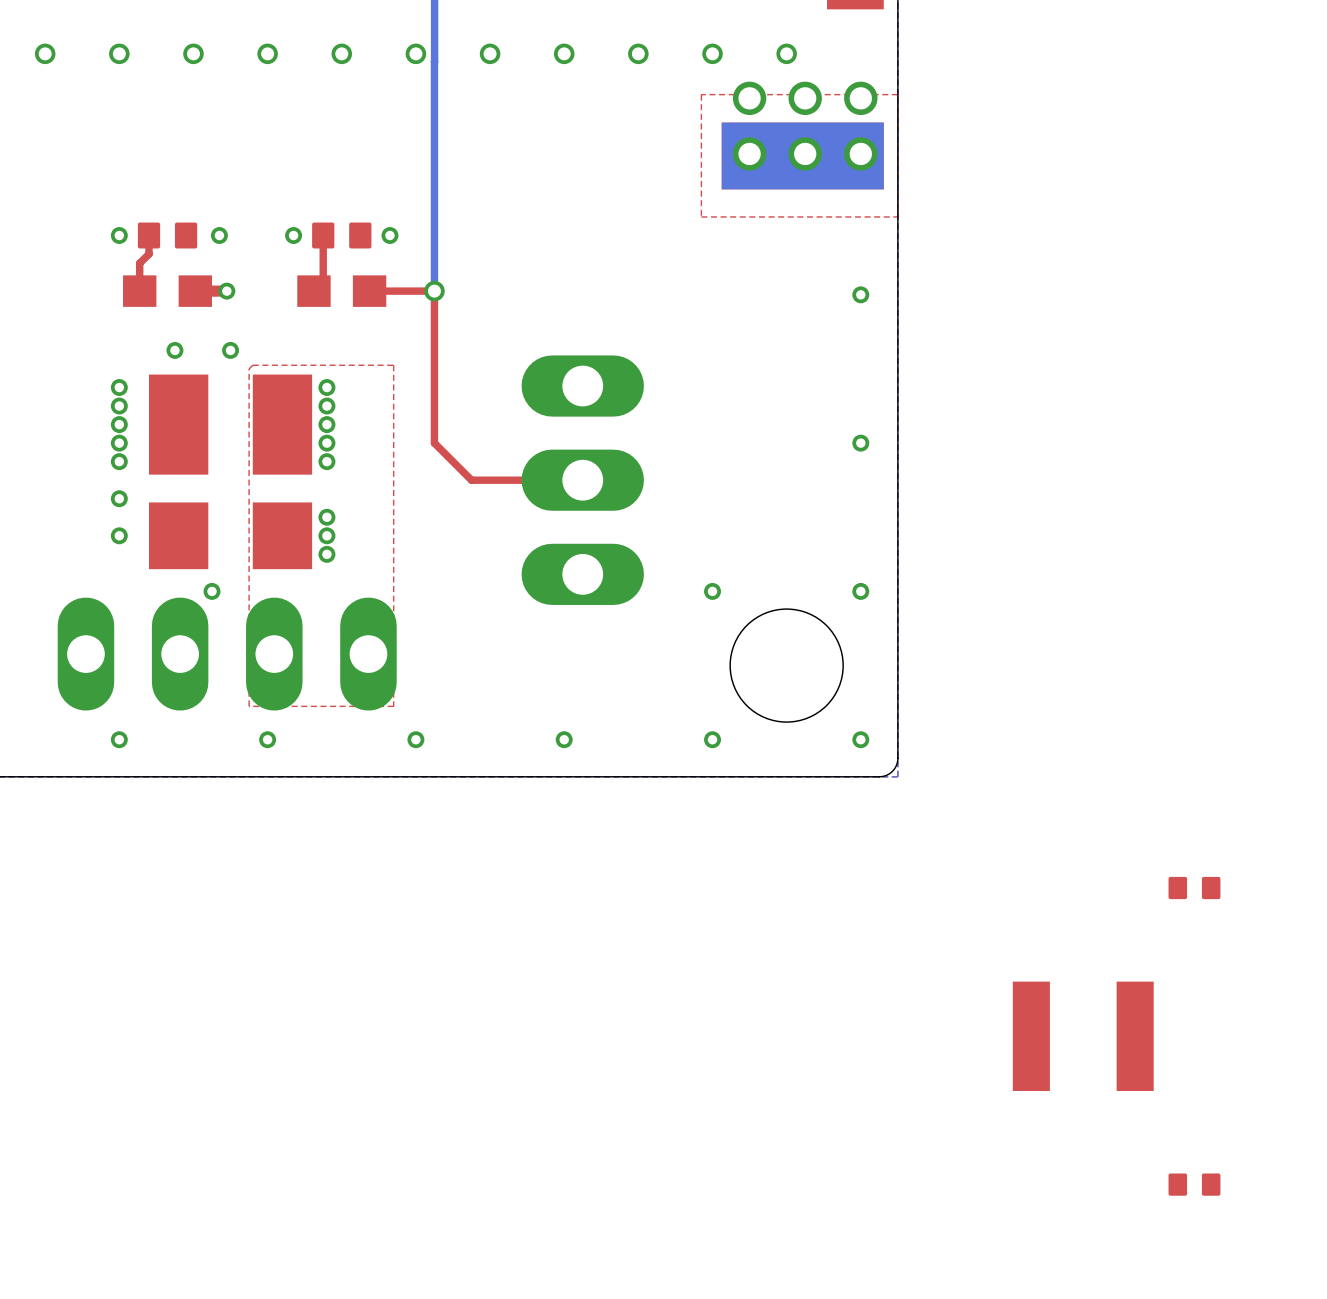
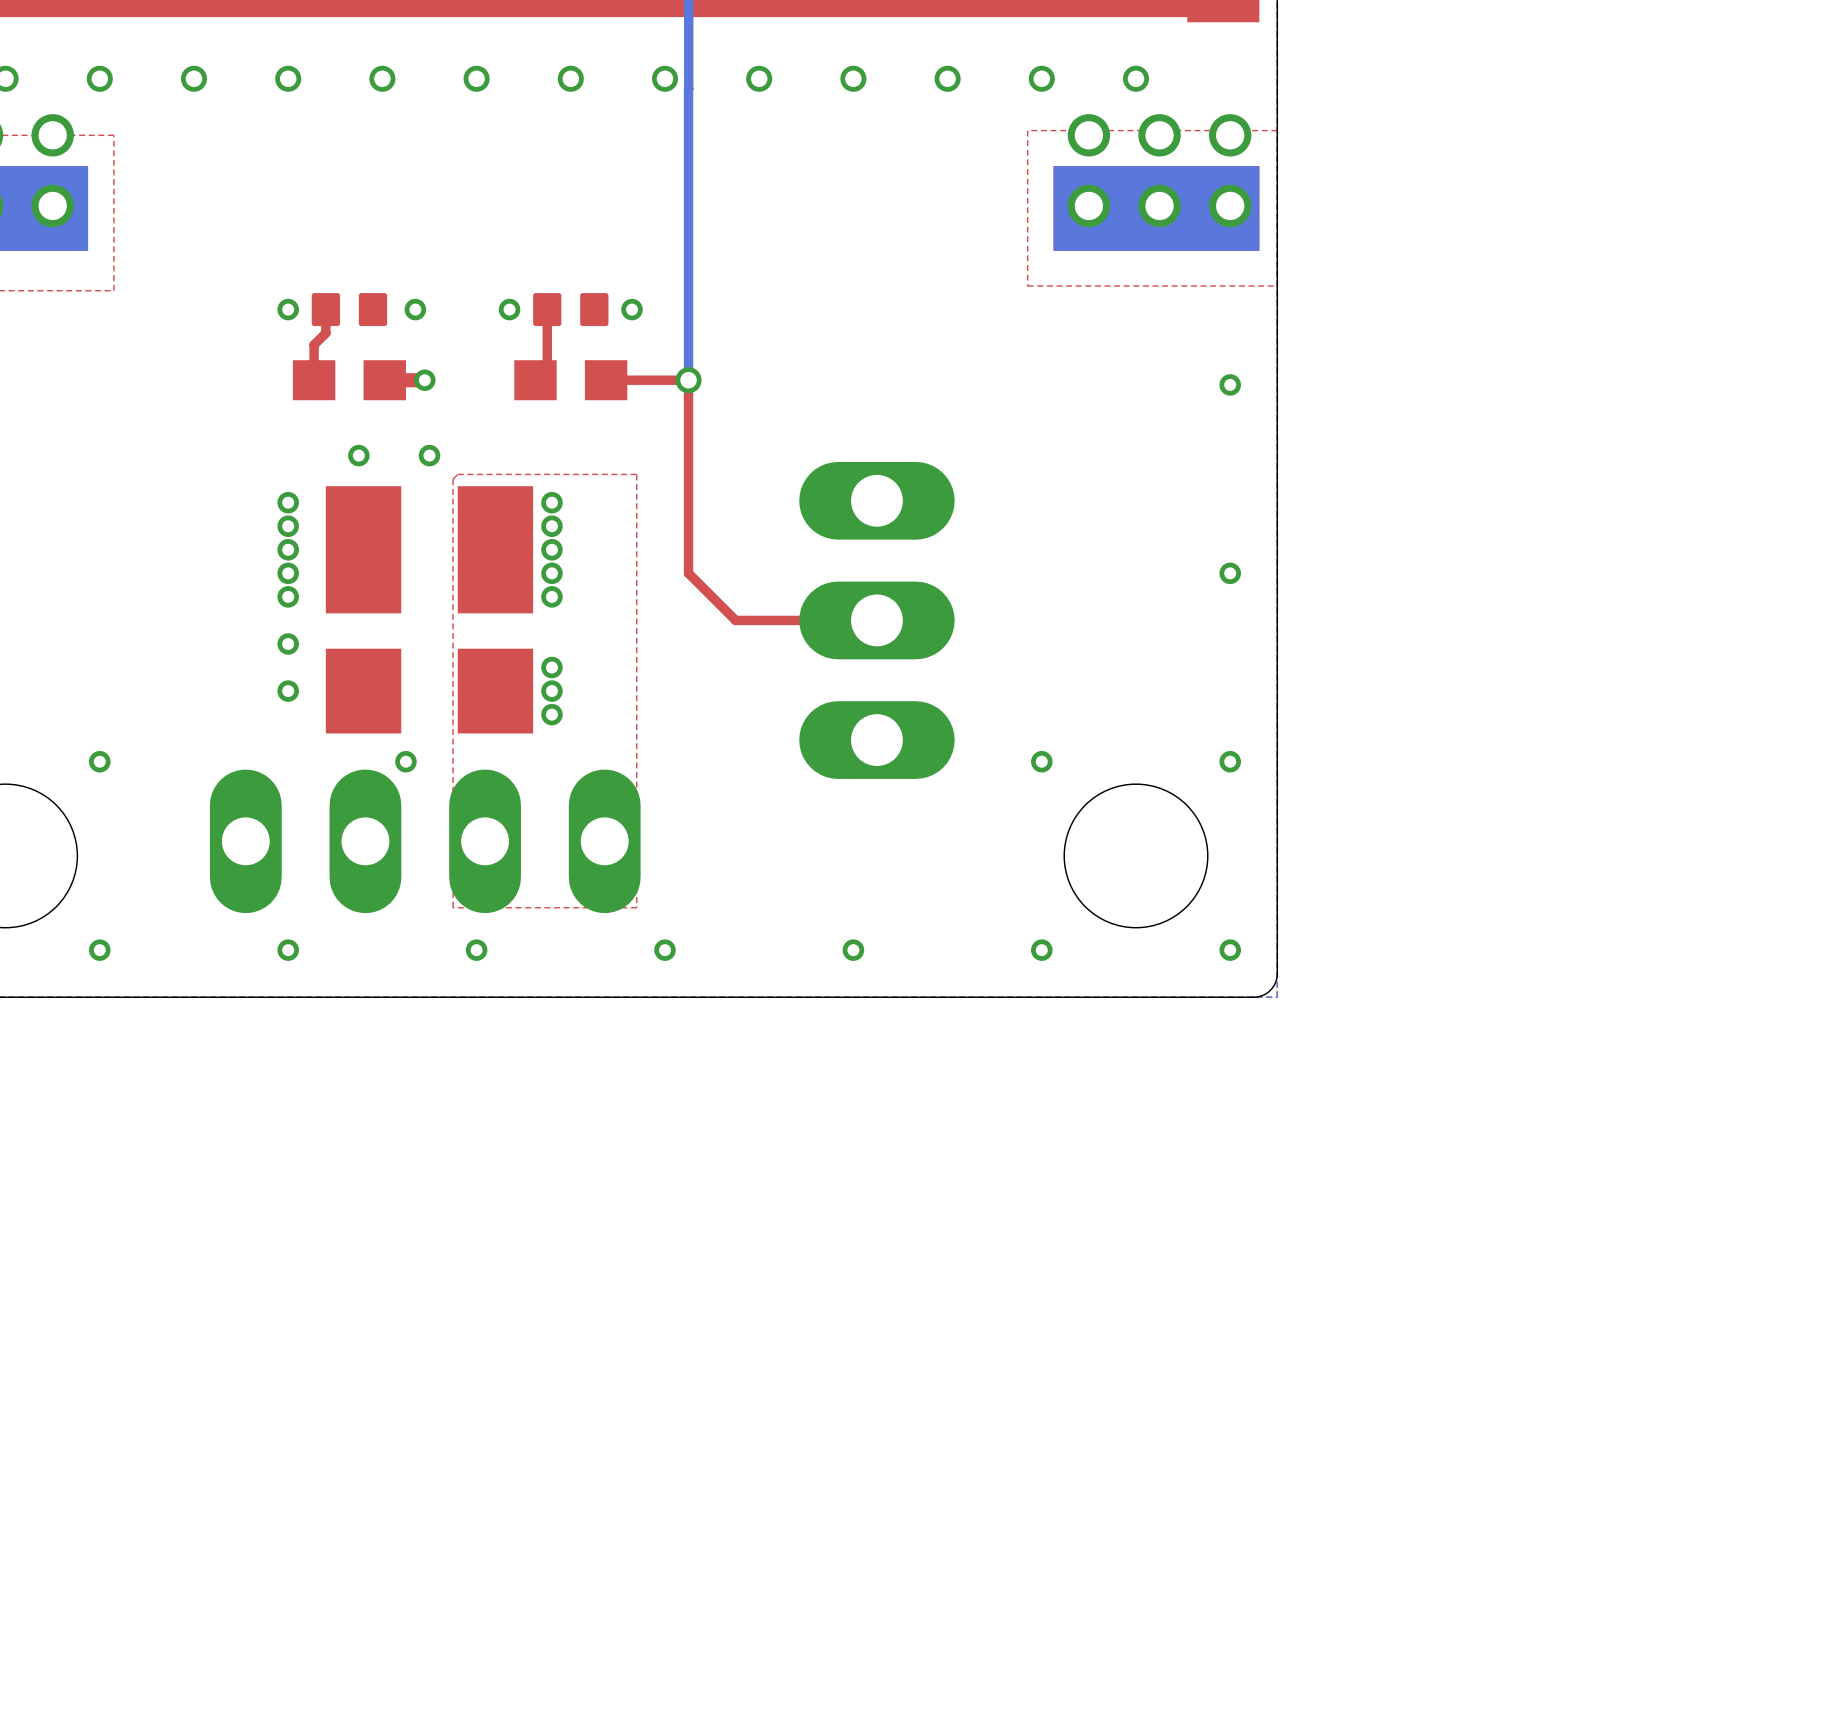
part: (1194, 888) -> none
part: (1083, 1036) -> none
part: (1194, 1184) -> none

